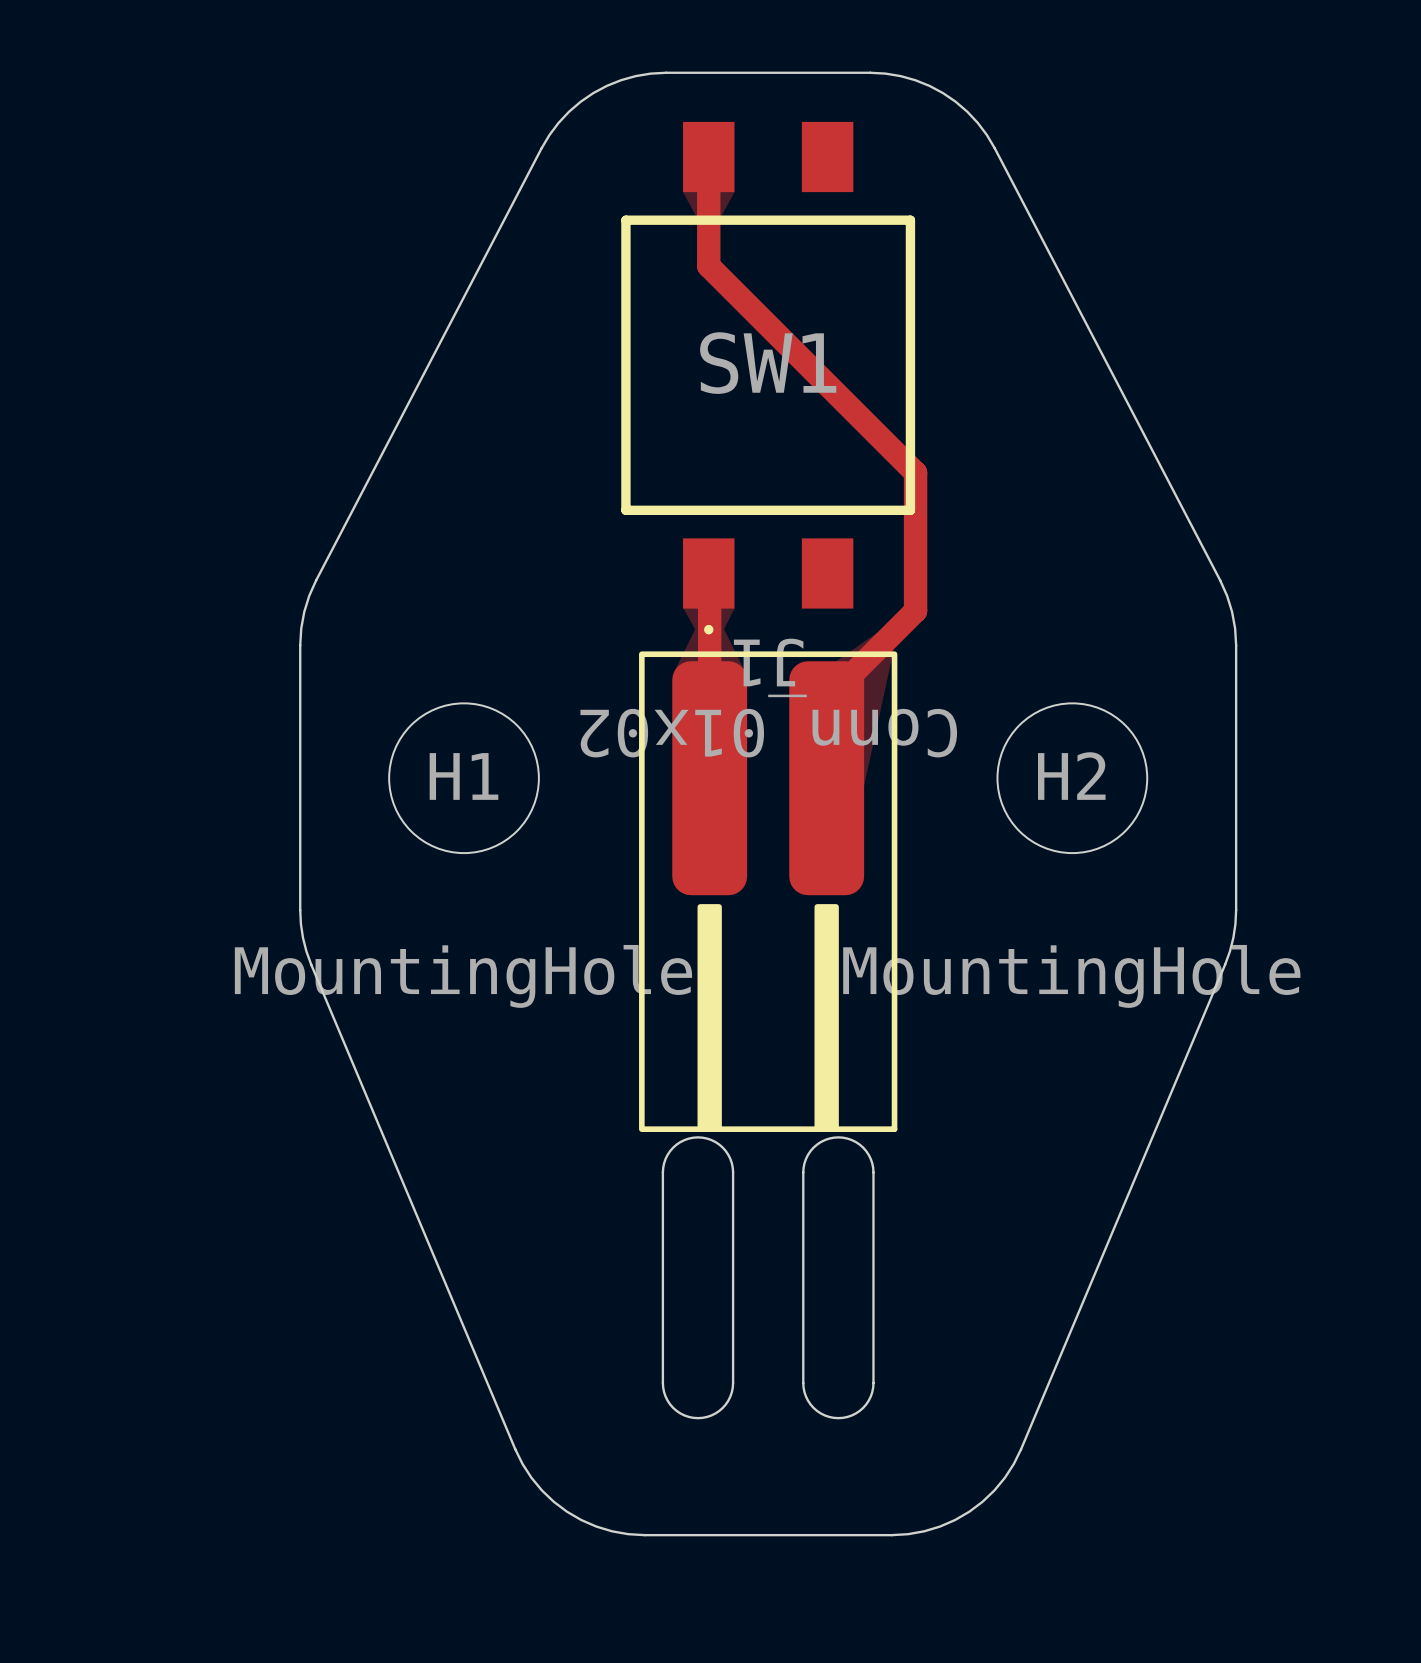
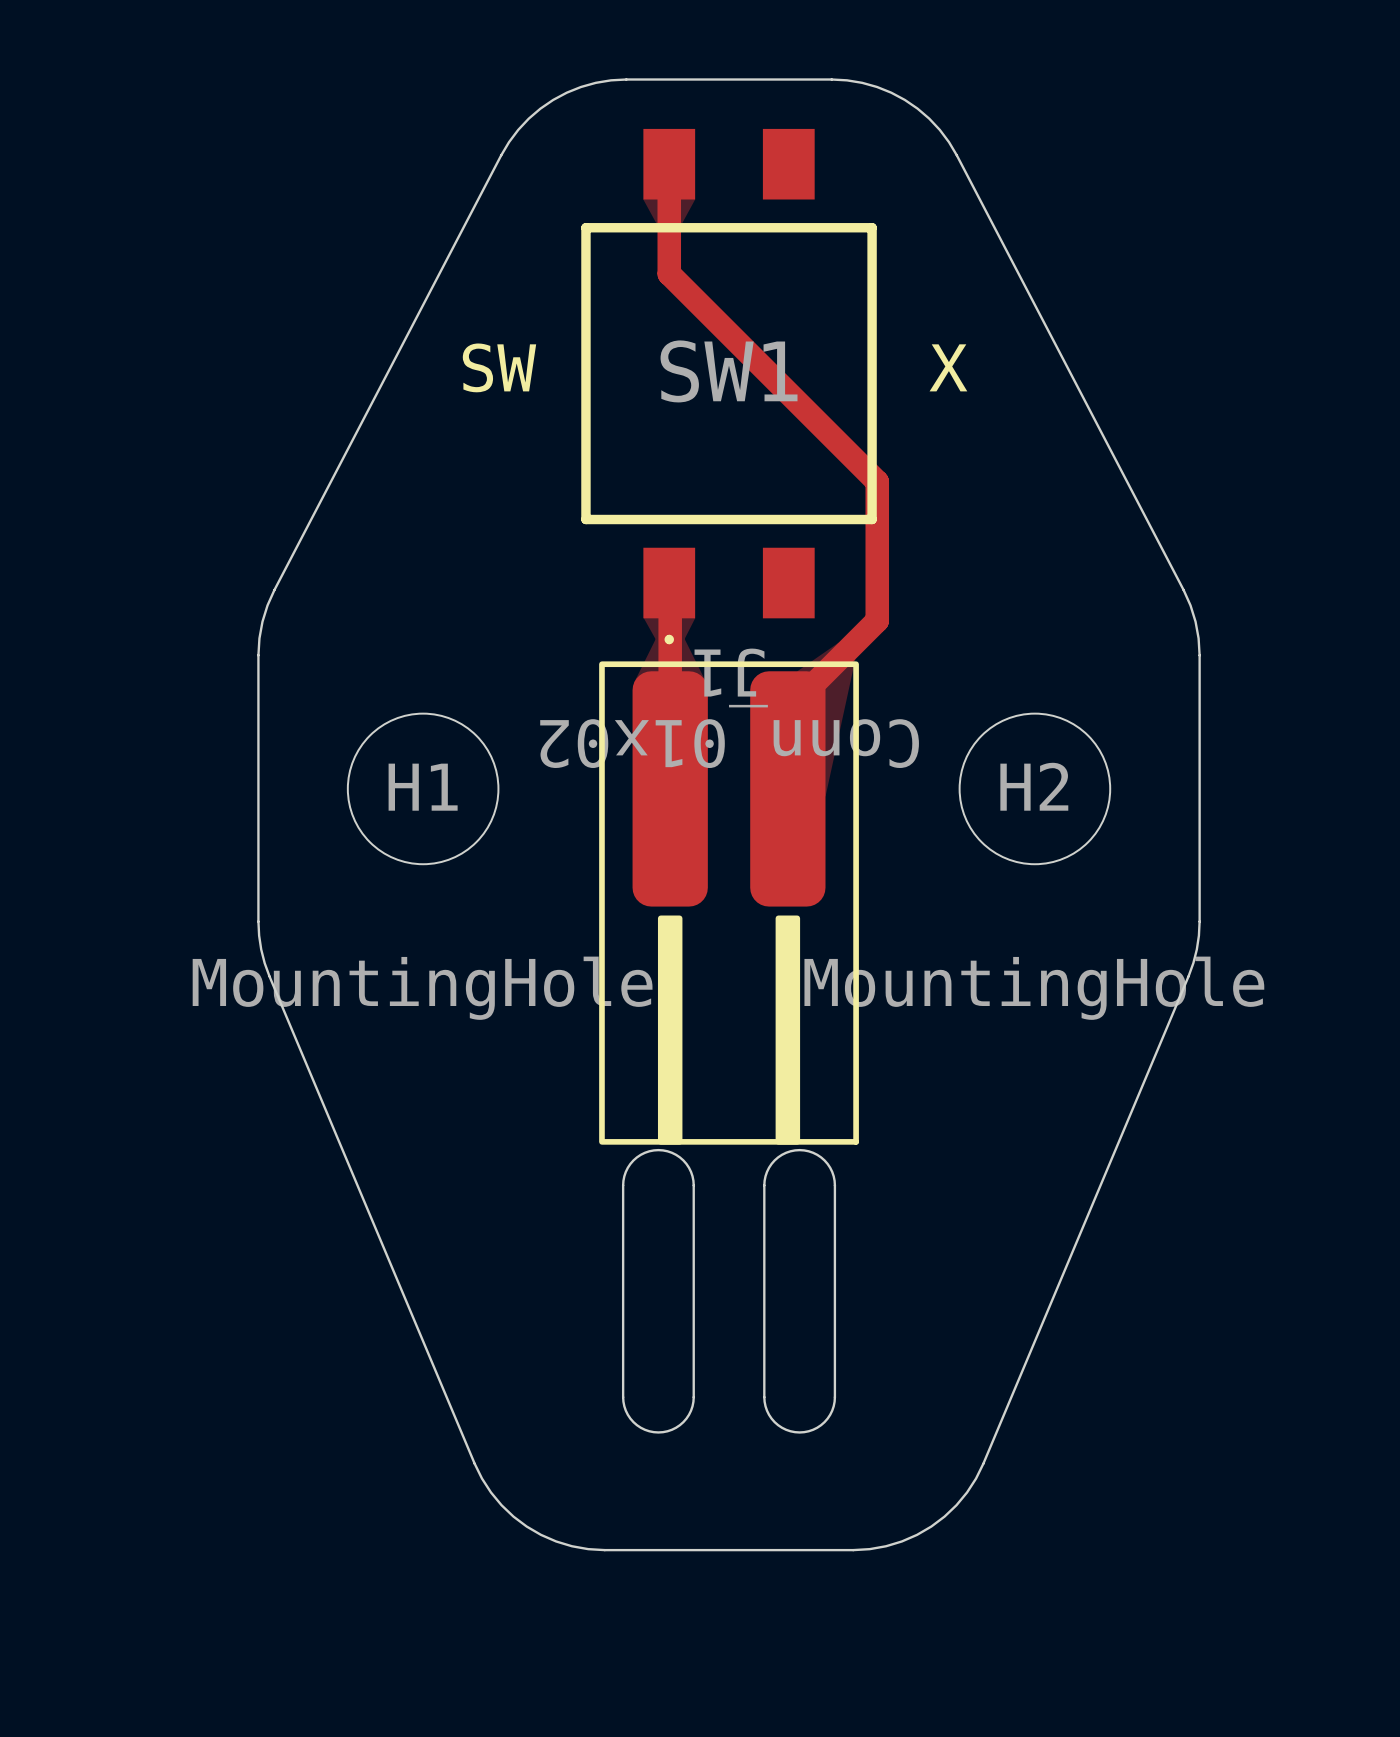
text: none -> SW (499, 367)
text: none -> X (948, 367)

